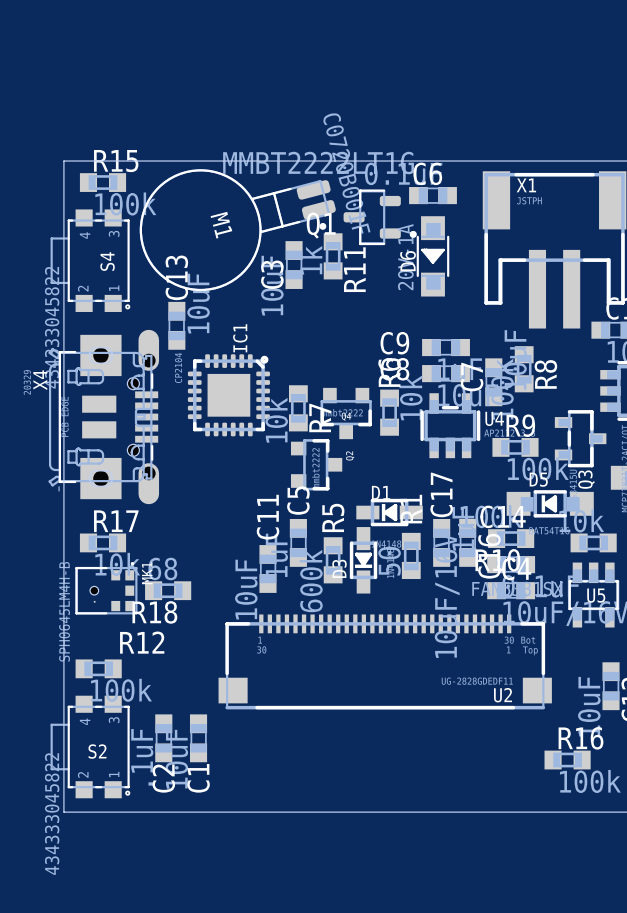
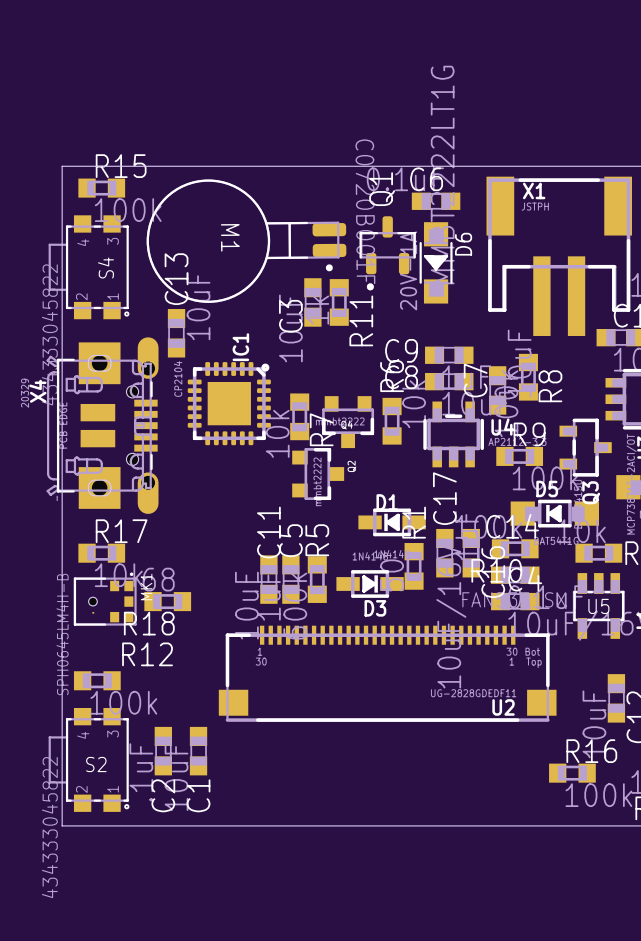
Q1 rotation: 0° (380, 217) -> 90° clockwise (387, 253)
M1 rotation: 0° (237, 230) -> 14.2° clockwise (246, 241)
R11 position: (333, 256) -> (339, 302)
D6 name position: D6 (408, 261) -> D6 (463, 244)
C3 position: (294, 265) -> (312, 302)
C5 position: (298, 542) -> (290, 579)
R5 position: (333, 560) -> (317, 579)
D3 rotation: 0° (363, 560) -> 90° counterclockwise (370, 583)

